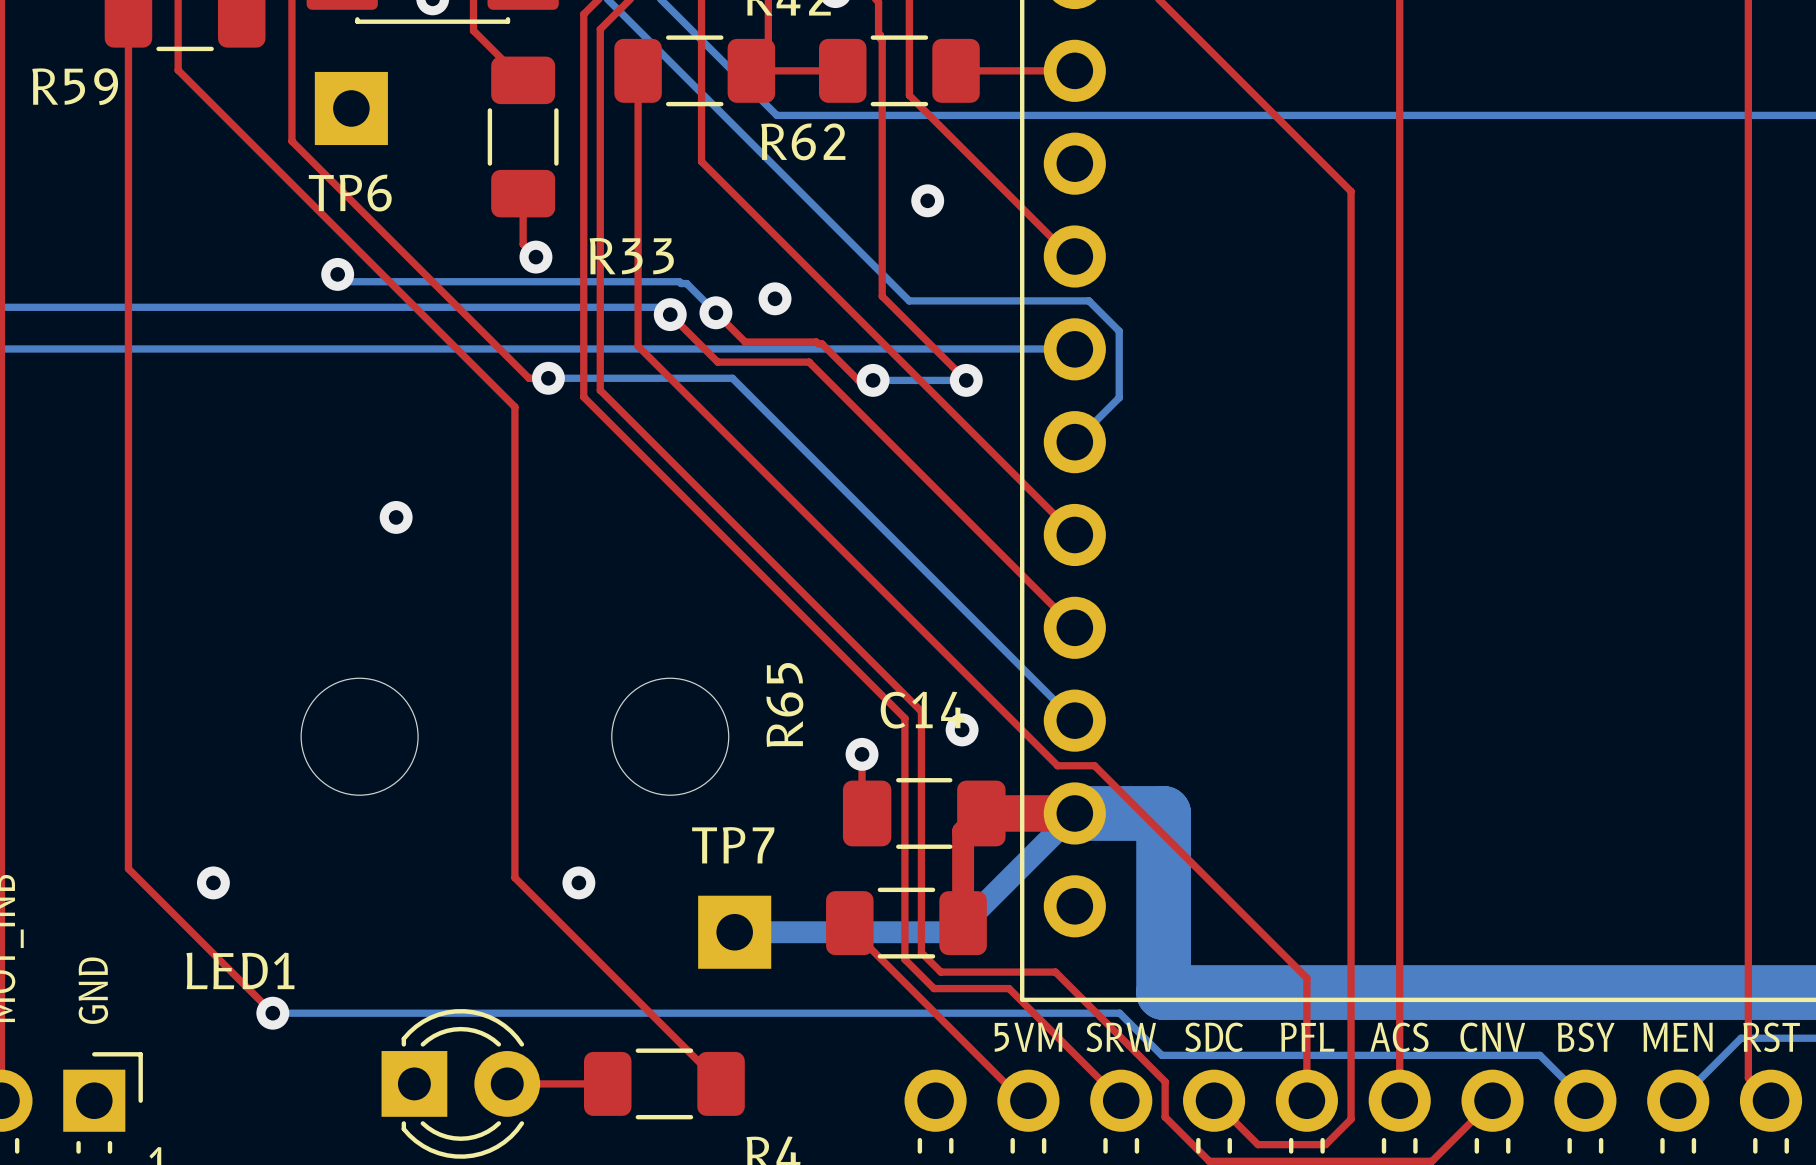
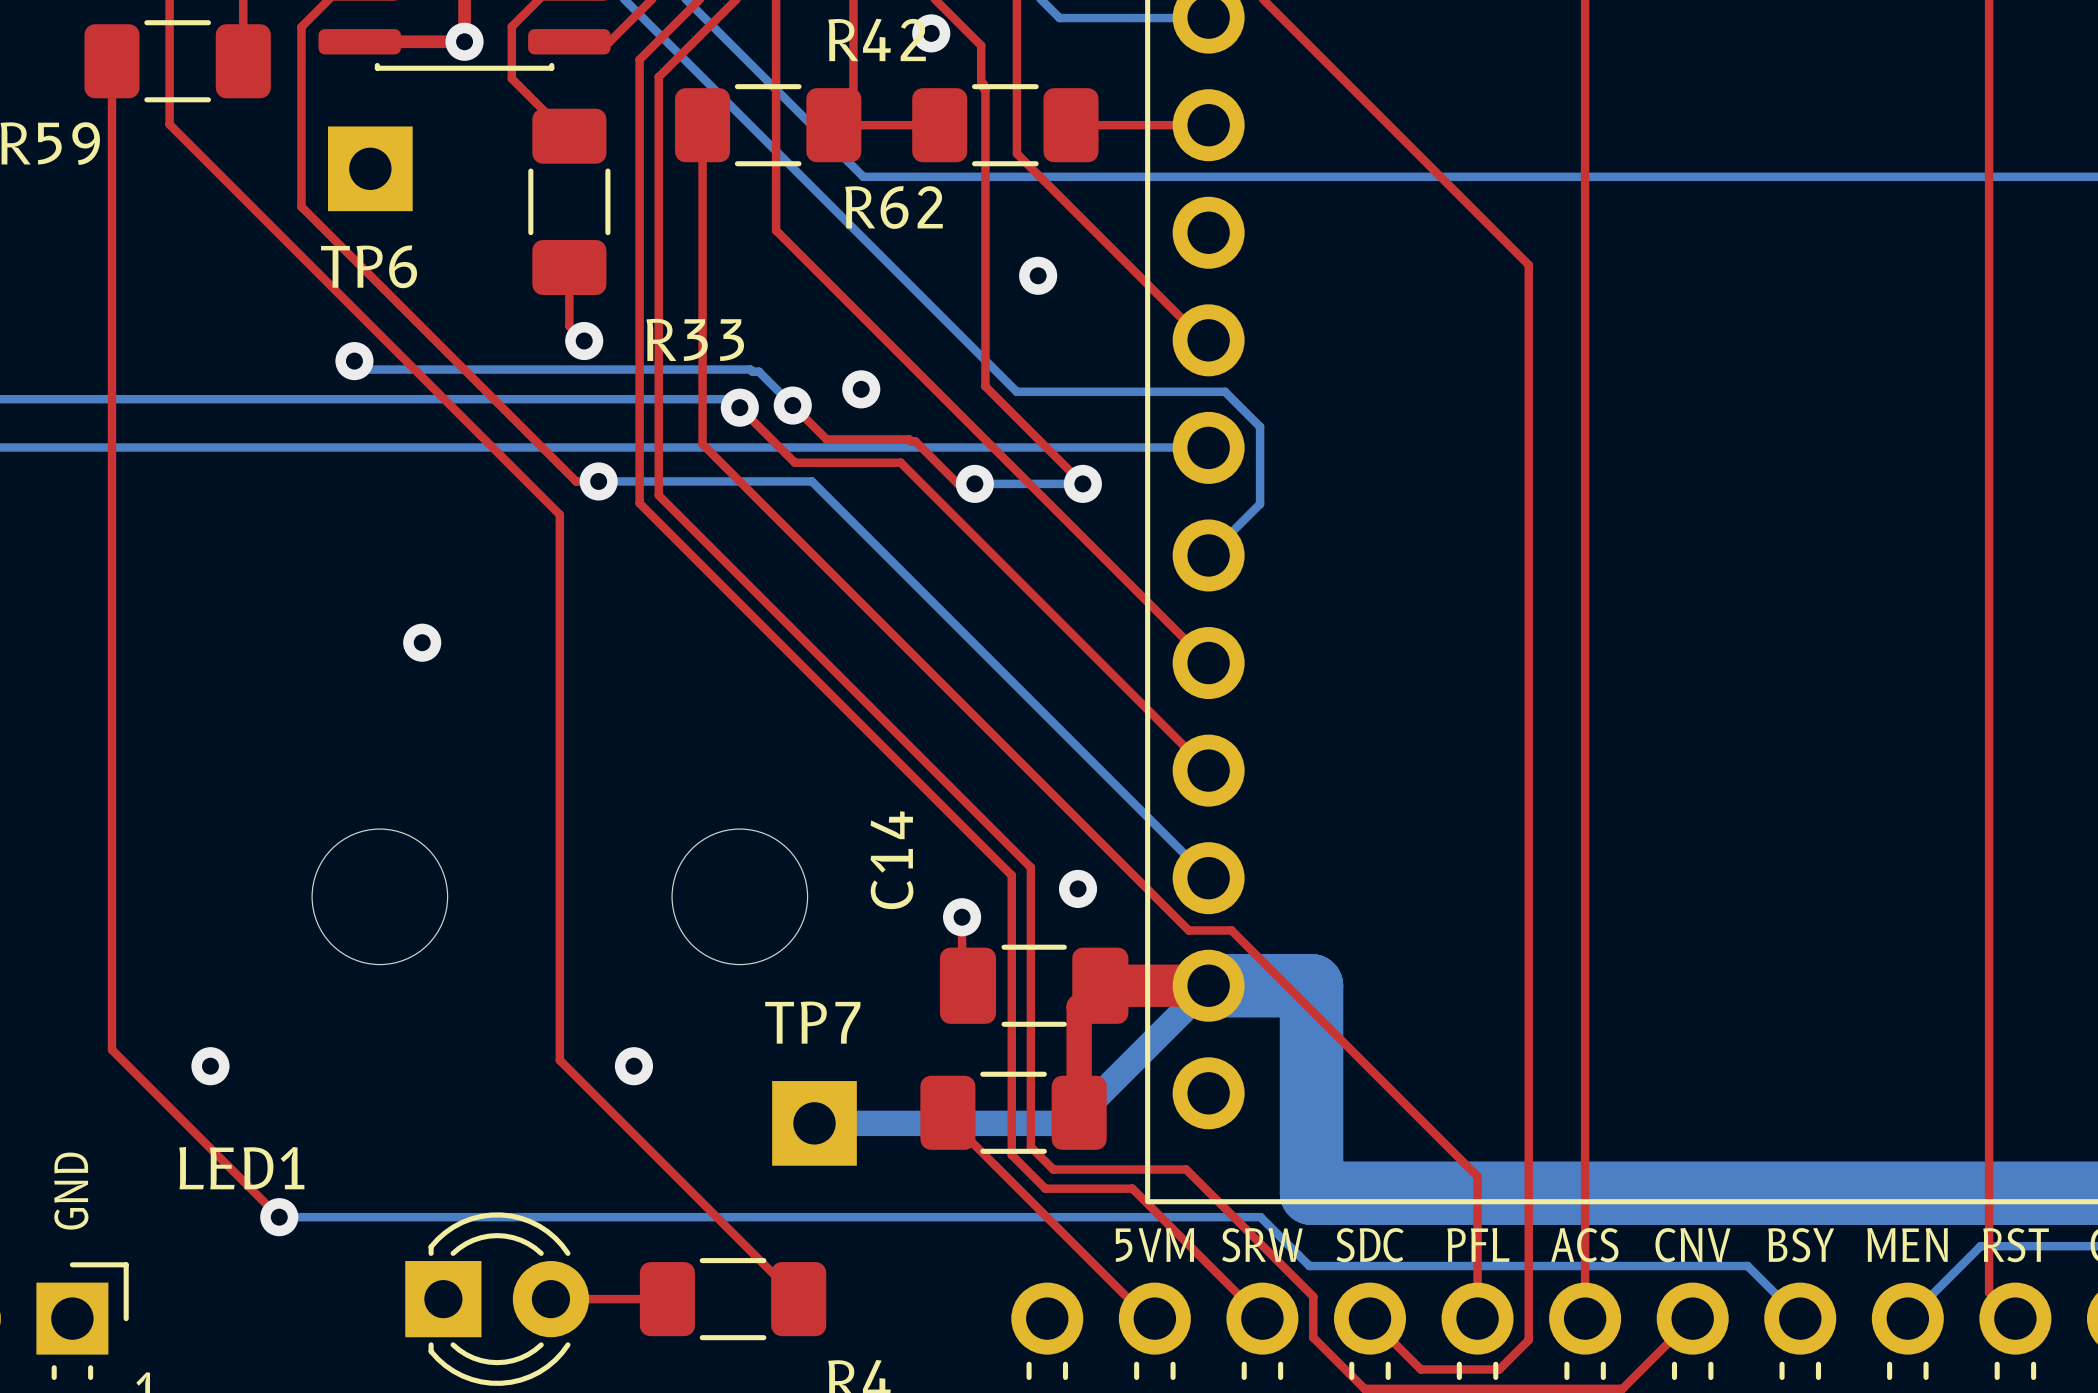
R65 name: R65 (784, 704) -> none
C14 name rotation: 0° (922, 710) -> 90° counterclockwise (892, 860)

